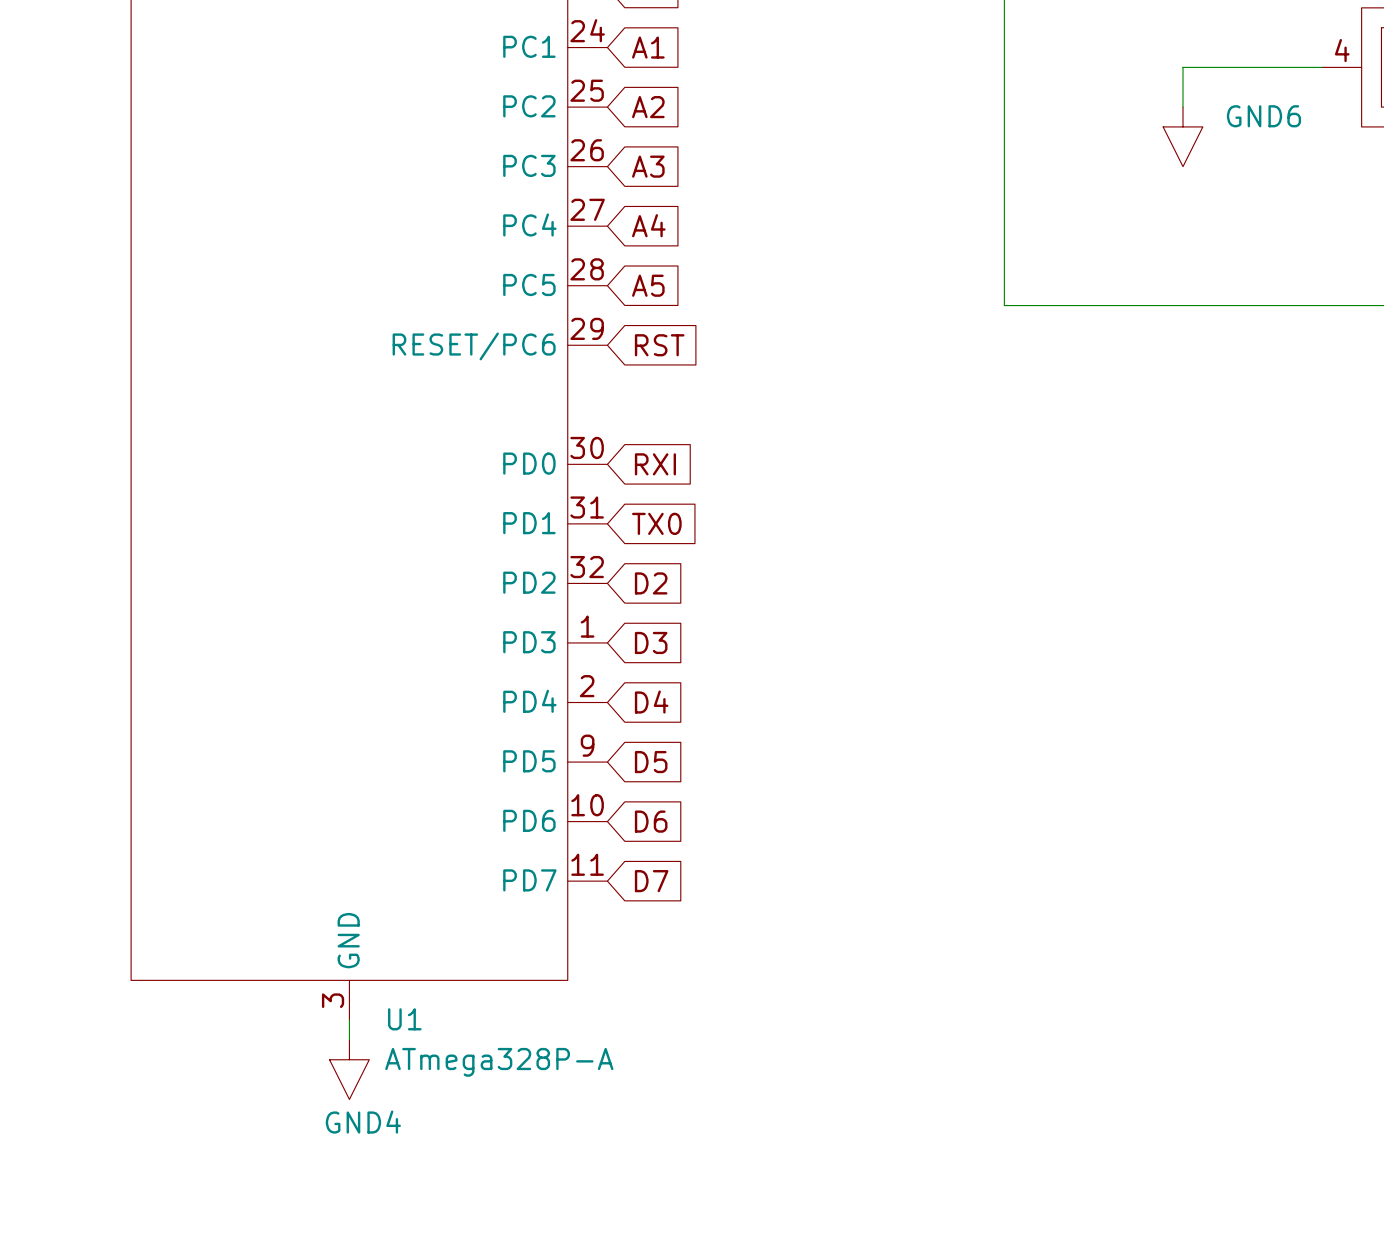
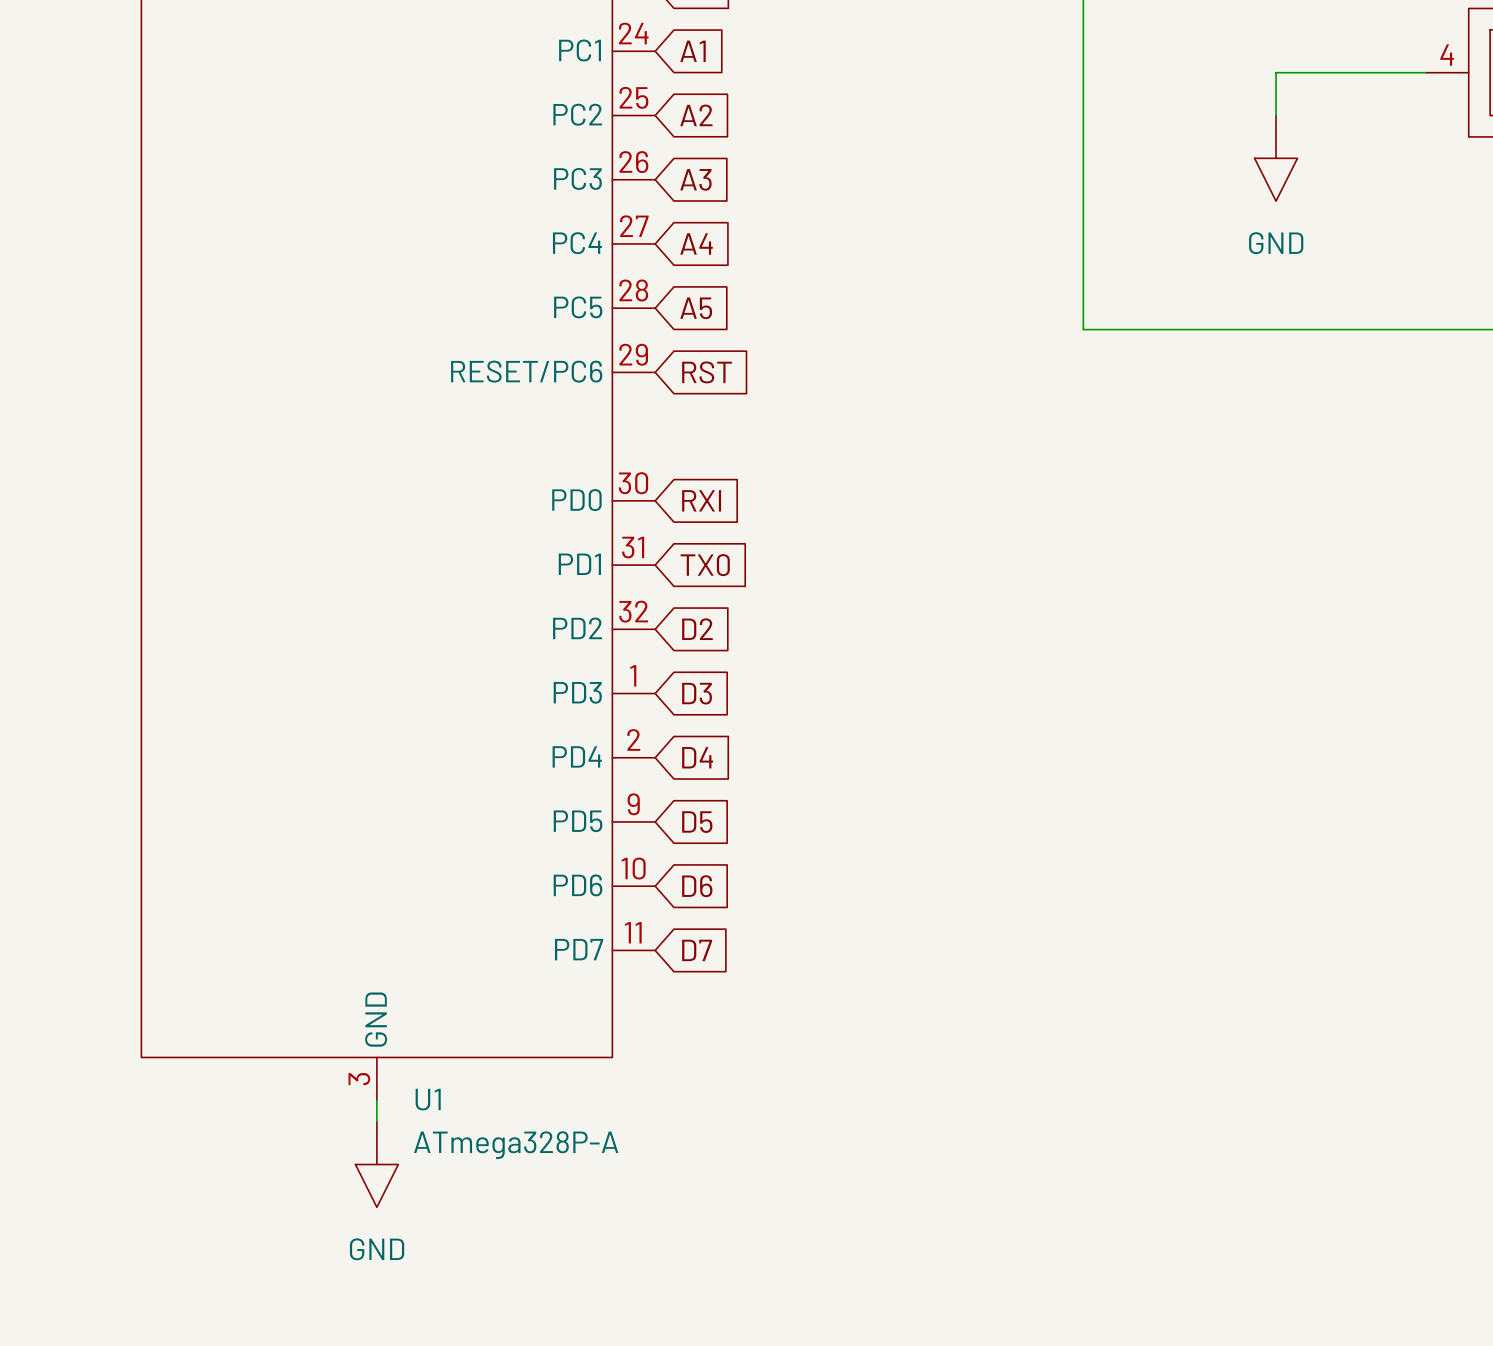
GND6: (1183, 136) -> none
power symbol: none -> GND (1276, 158)
GND4: (349, 1069) -> none
power symbol: none -> GND (376, 1164)

